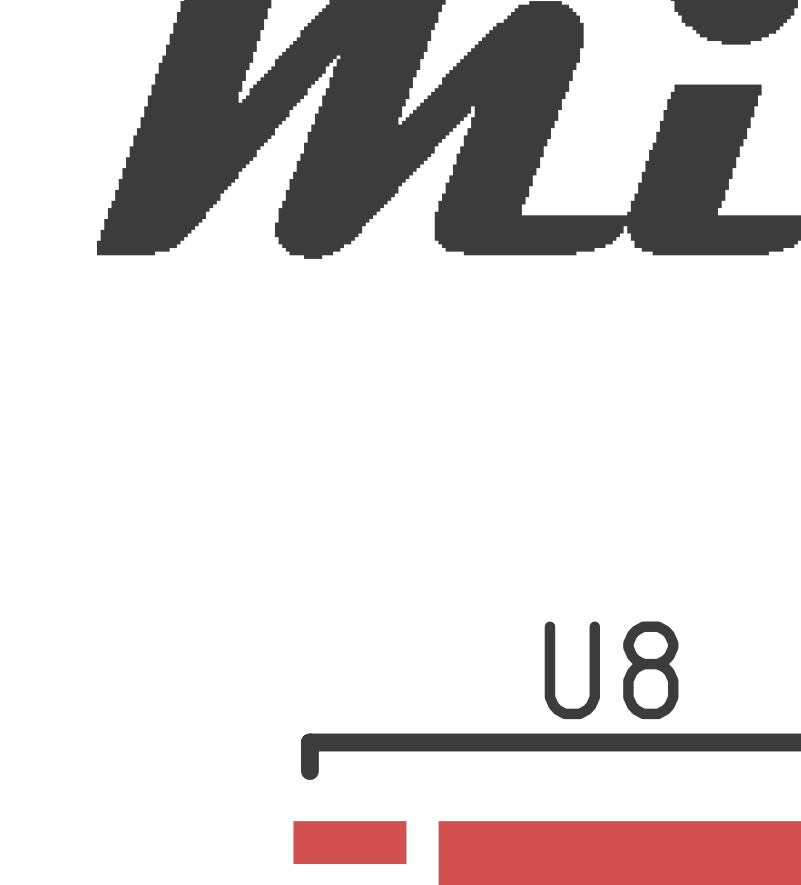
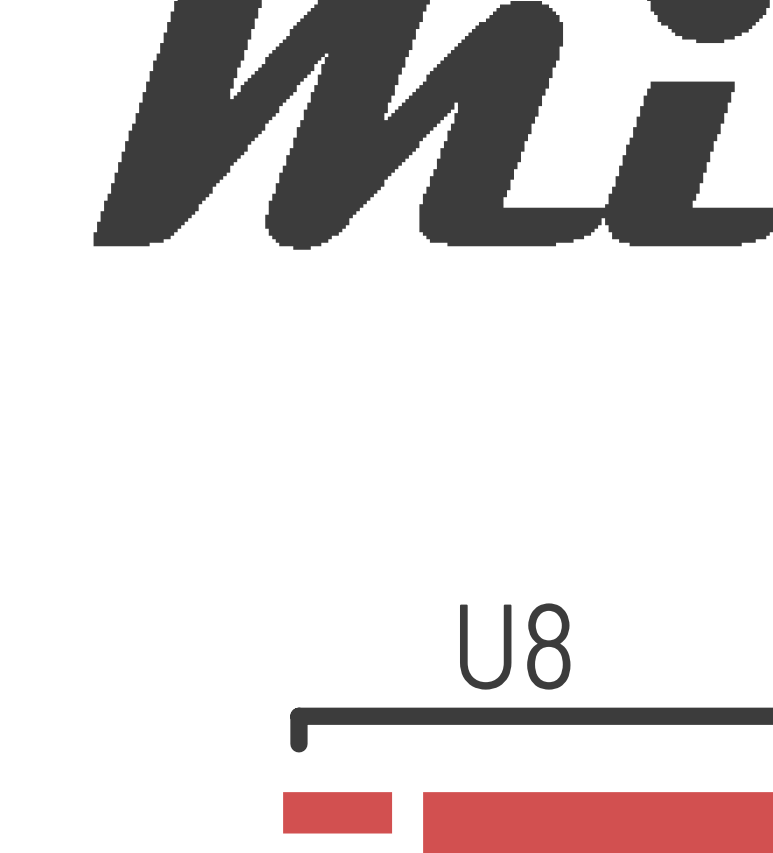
U8 name position: U8 (611, 670) -> U8 (515, 646)

